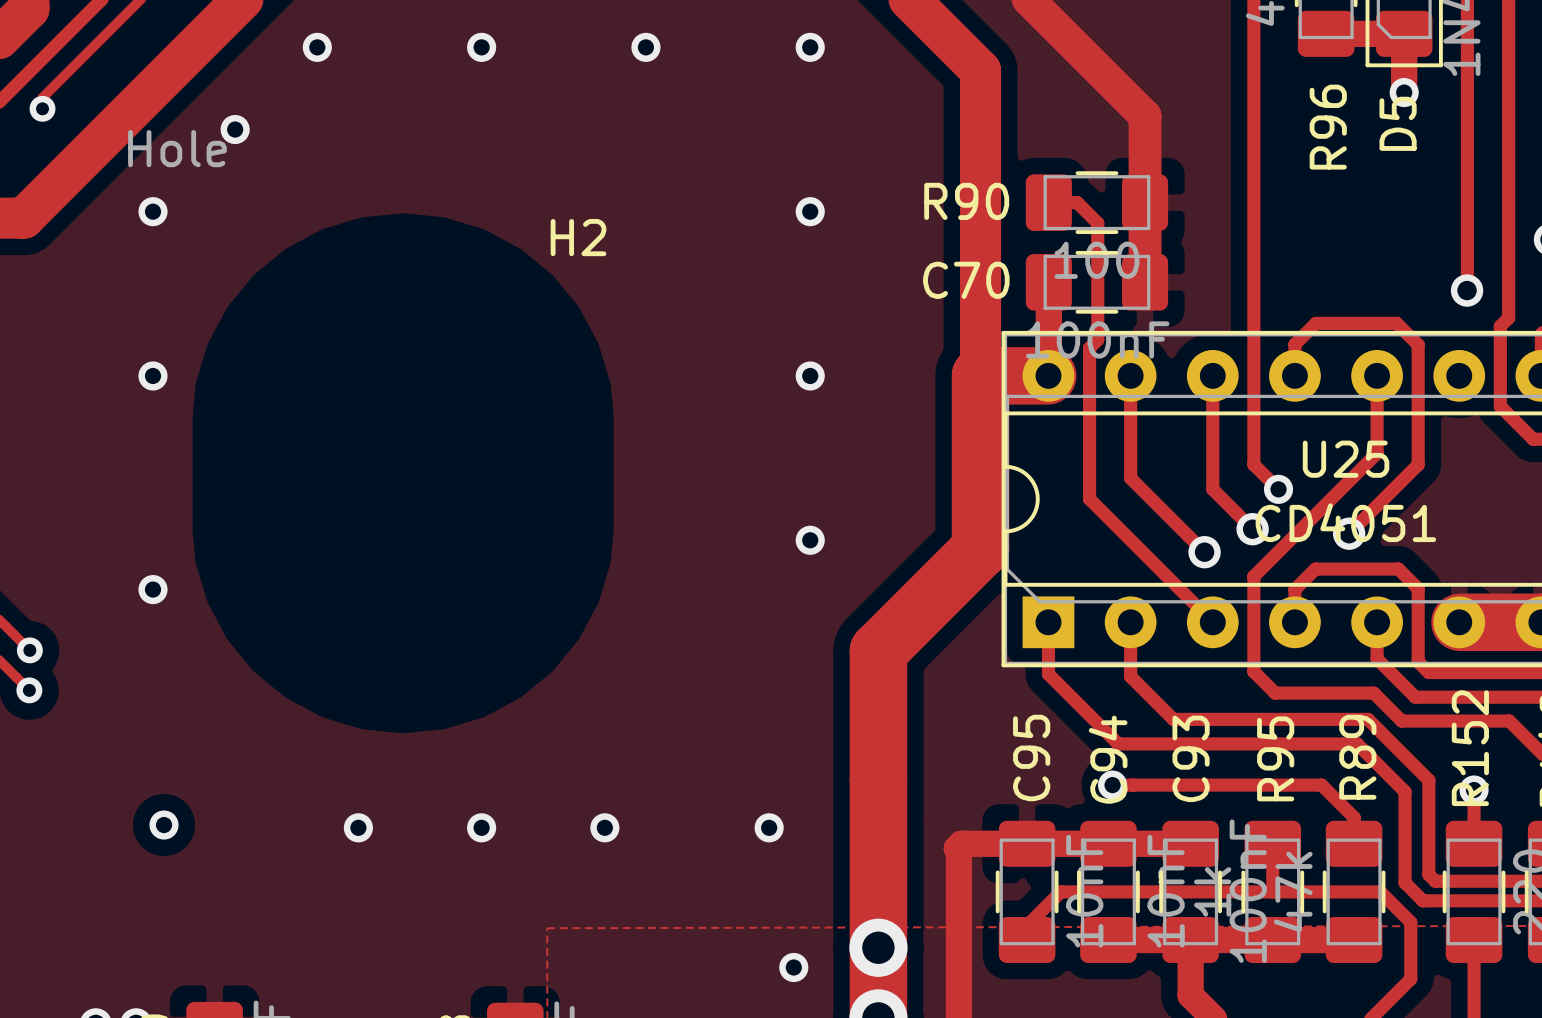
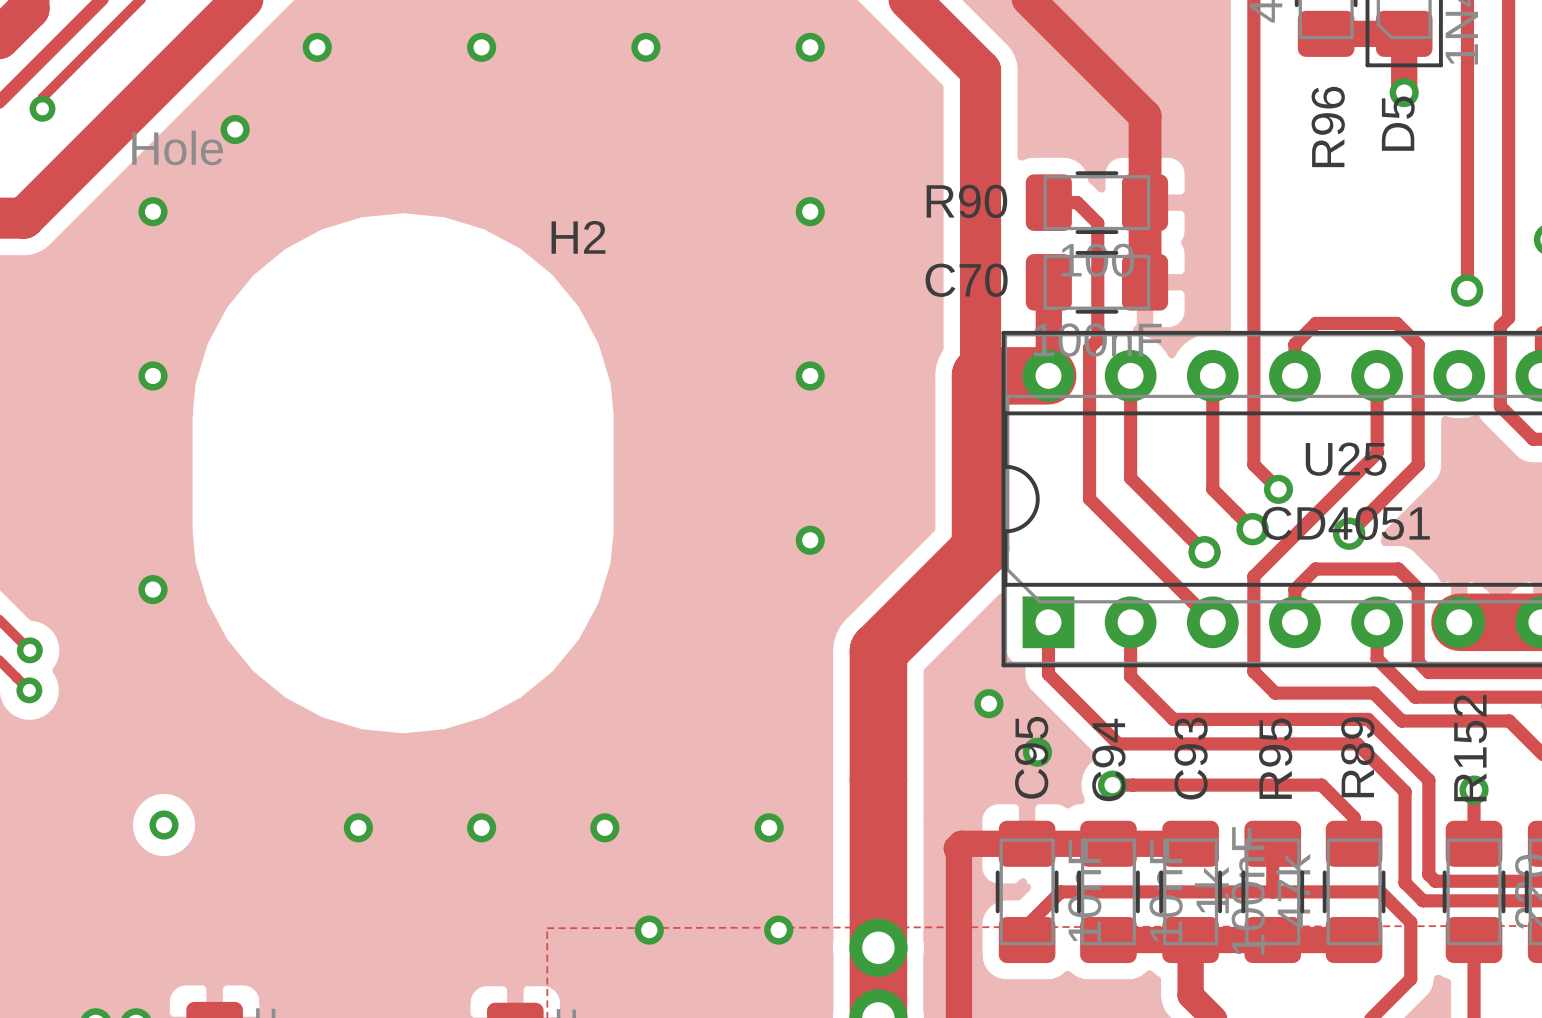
via: none -> (988, 703)
via: none -> (1037, 752)
via: none -> (649, 930)
via: none -> (778, 930)
via: (793, 967) -> none

